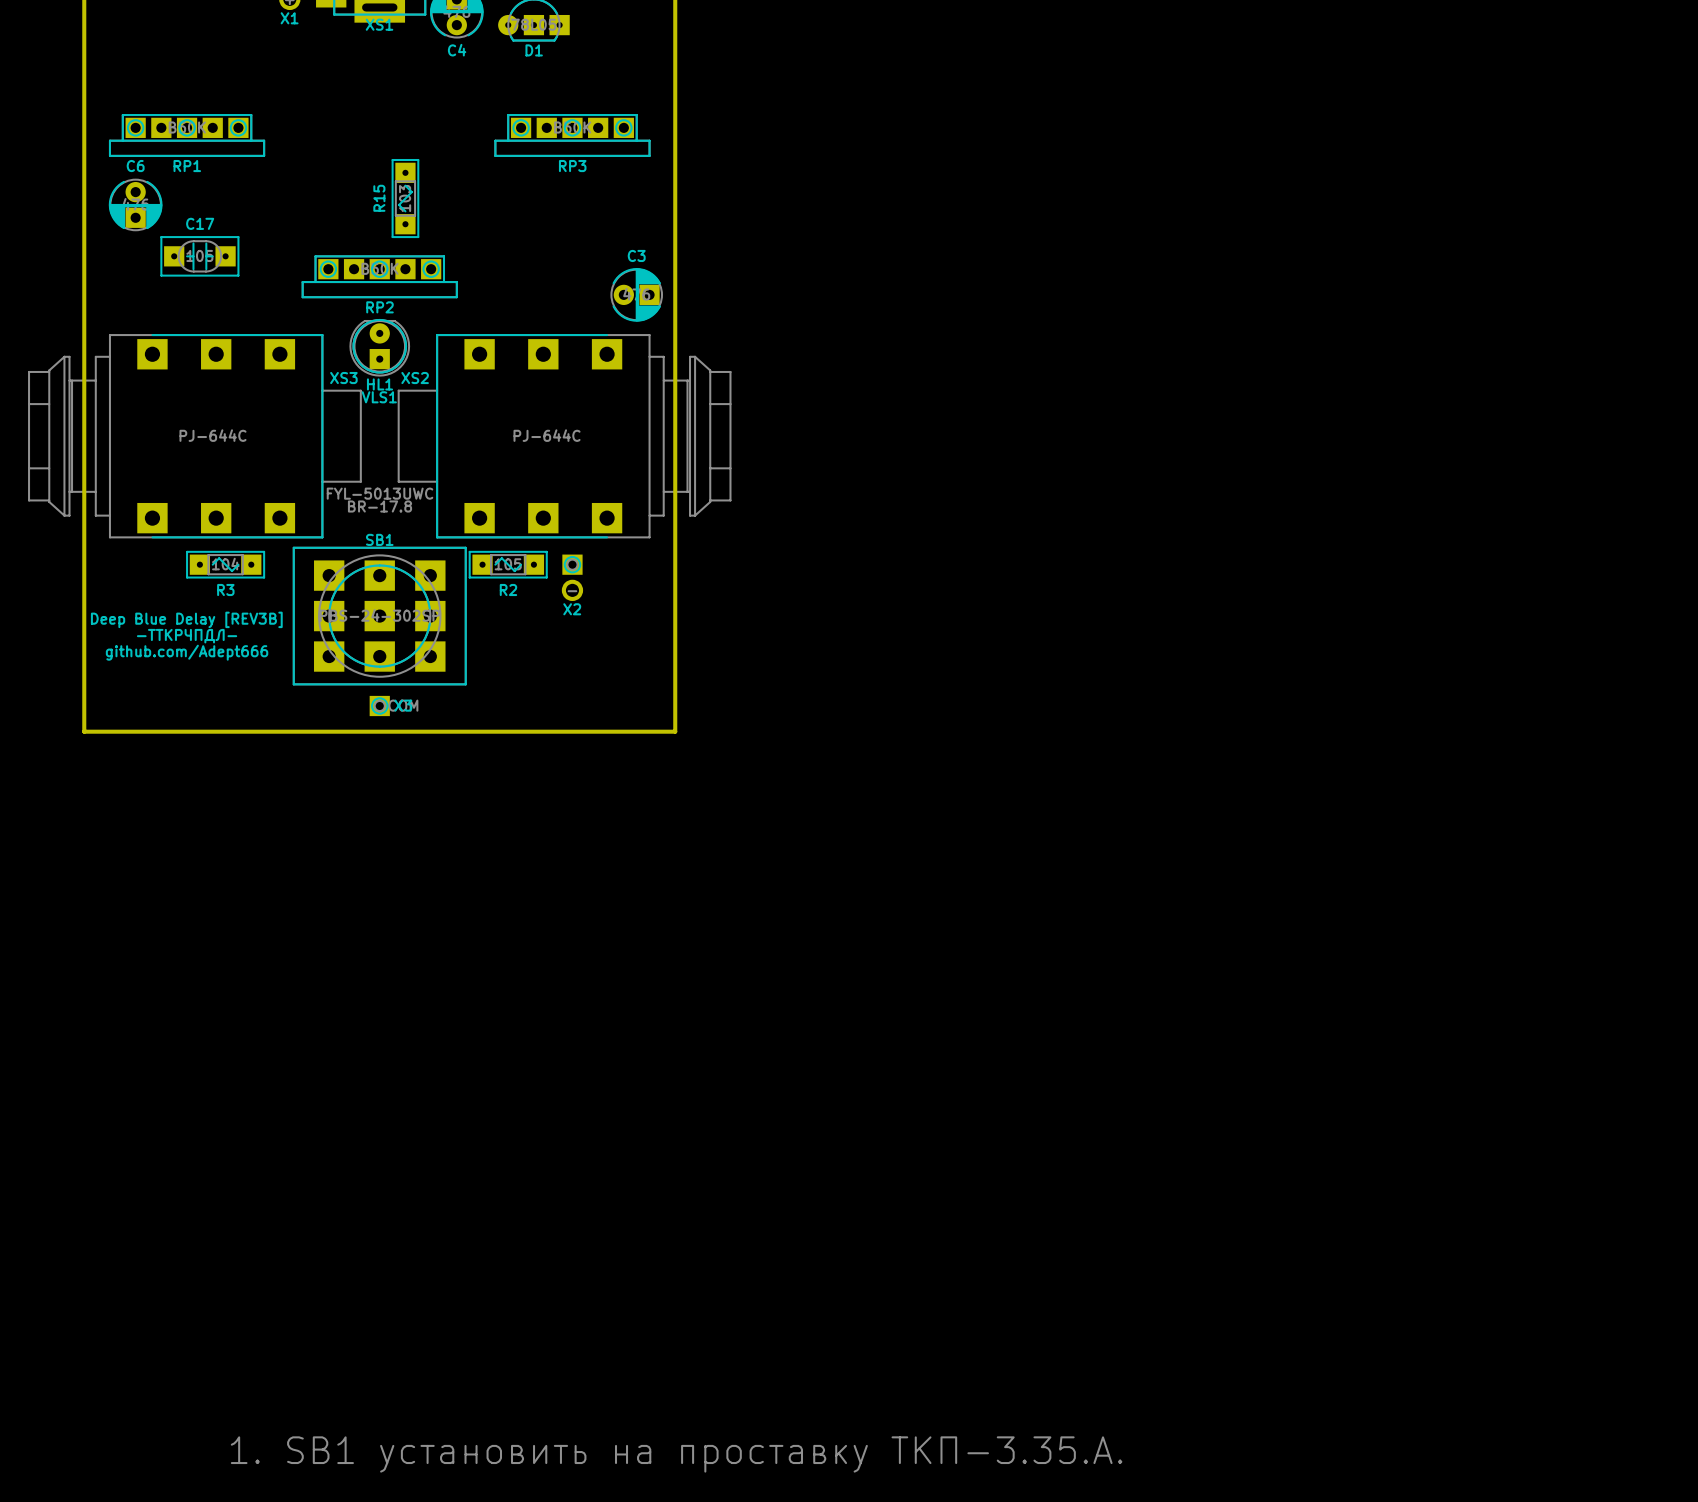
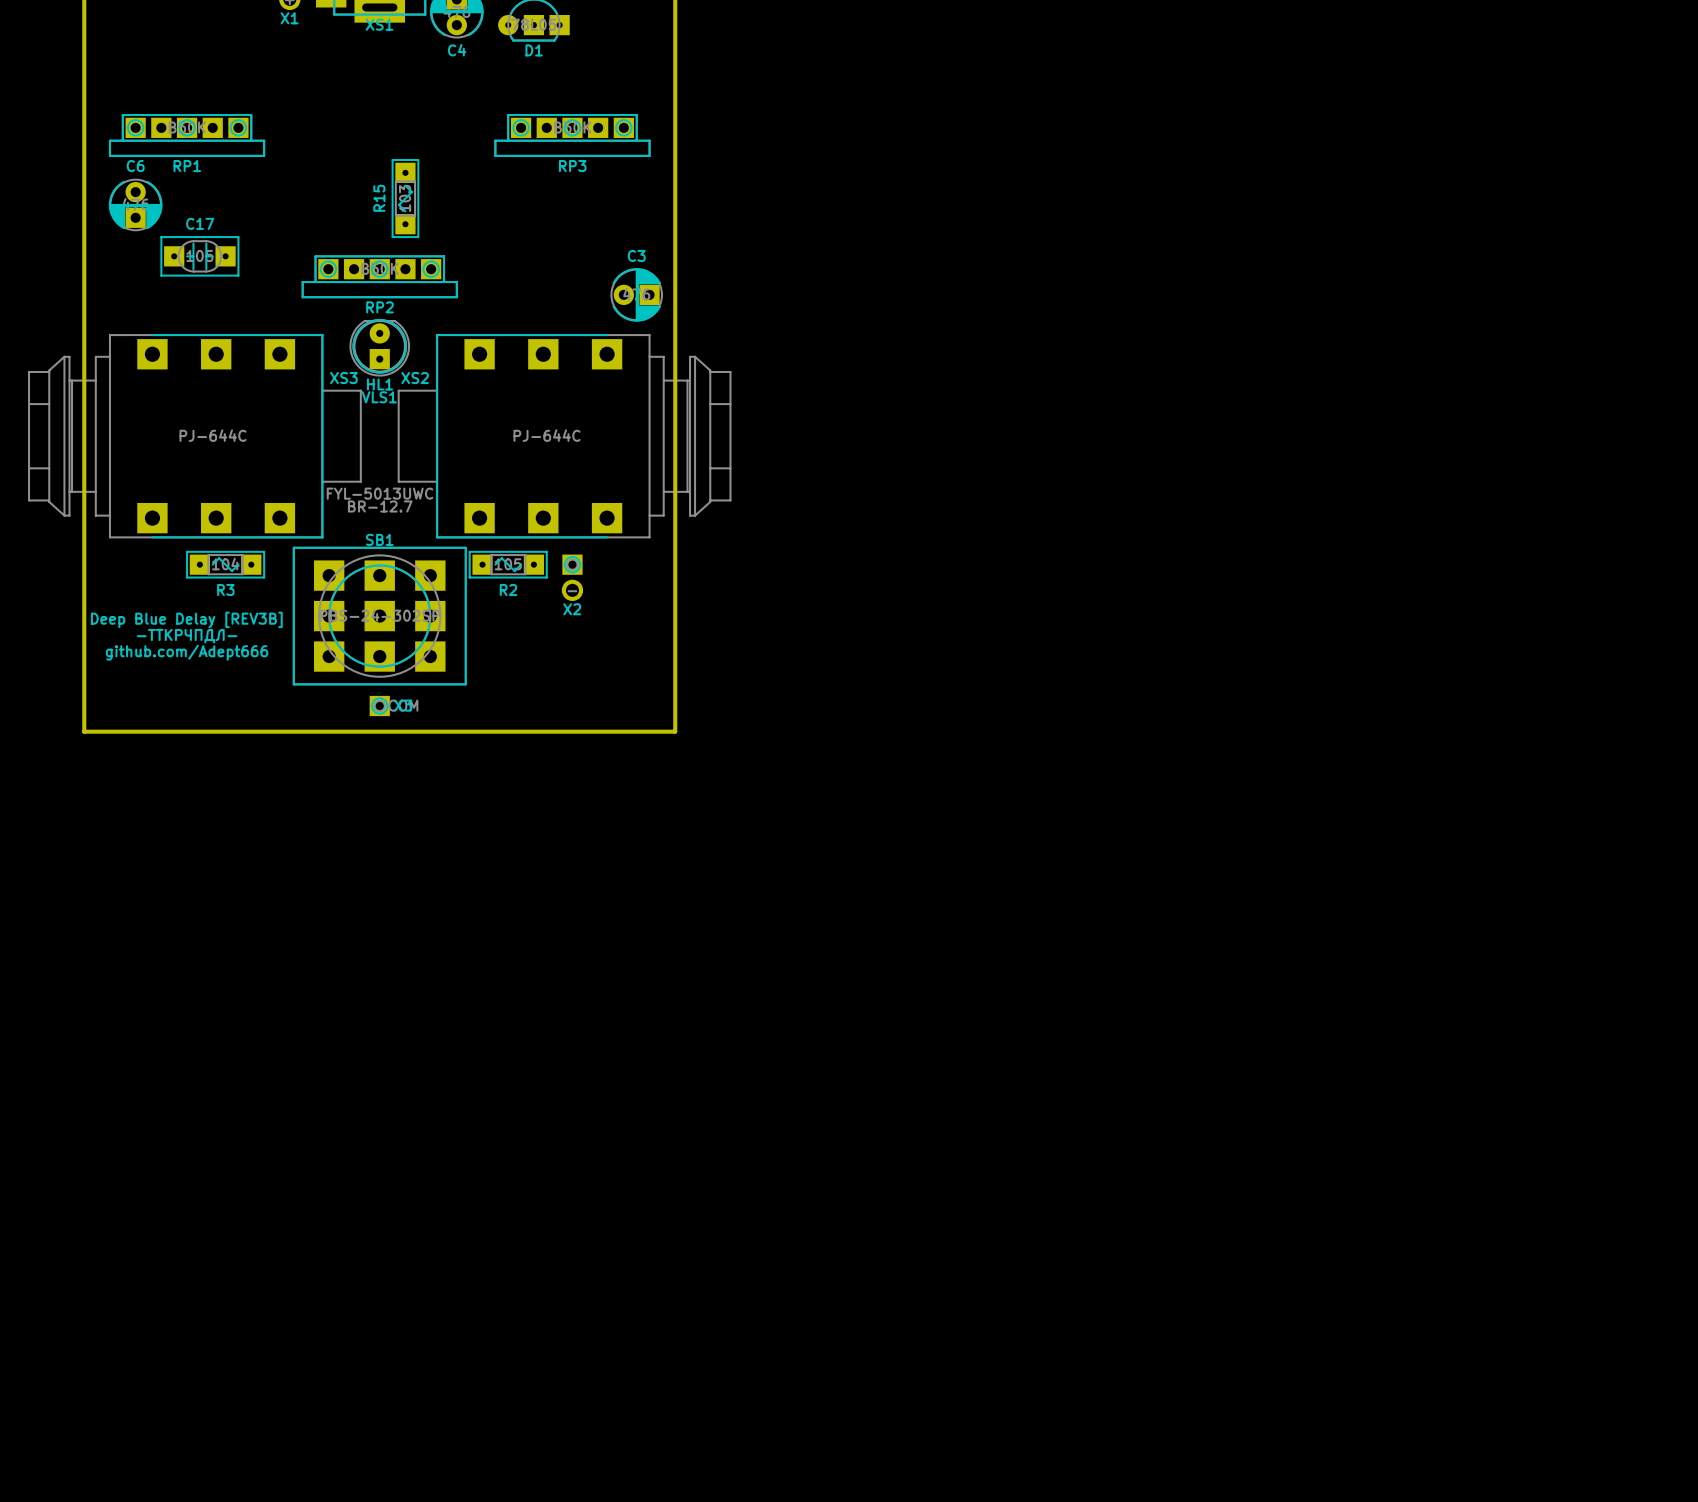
VLS1 value: BR-17.8 (380, 506) -> BR-12.7 (380, 506)
text: 1. SB1 установить на проставку ТКП-3.35.A. (676, 1454) -> none

